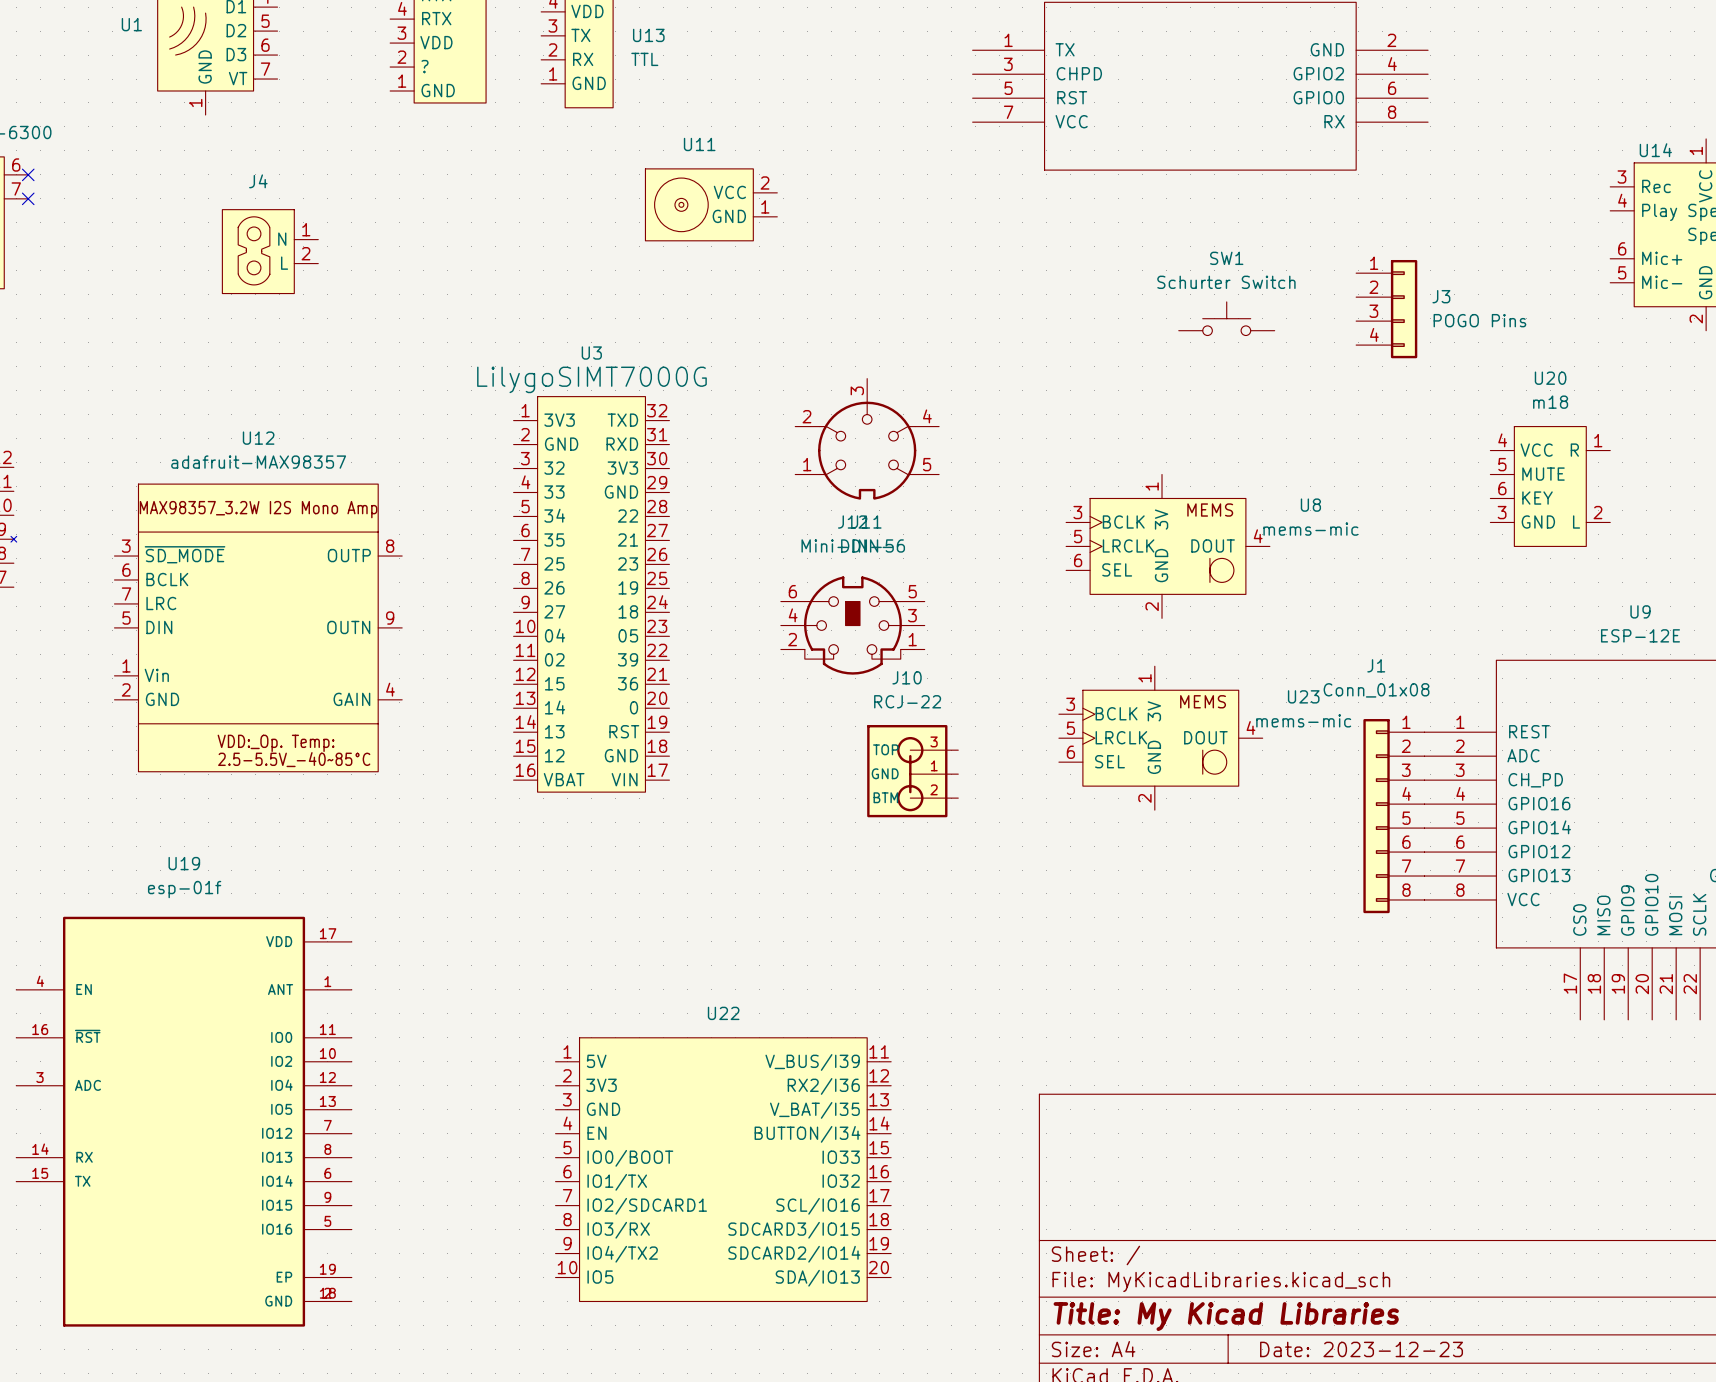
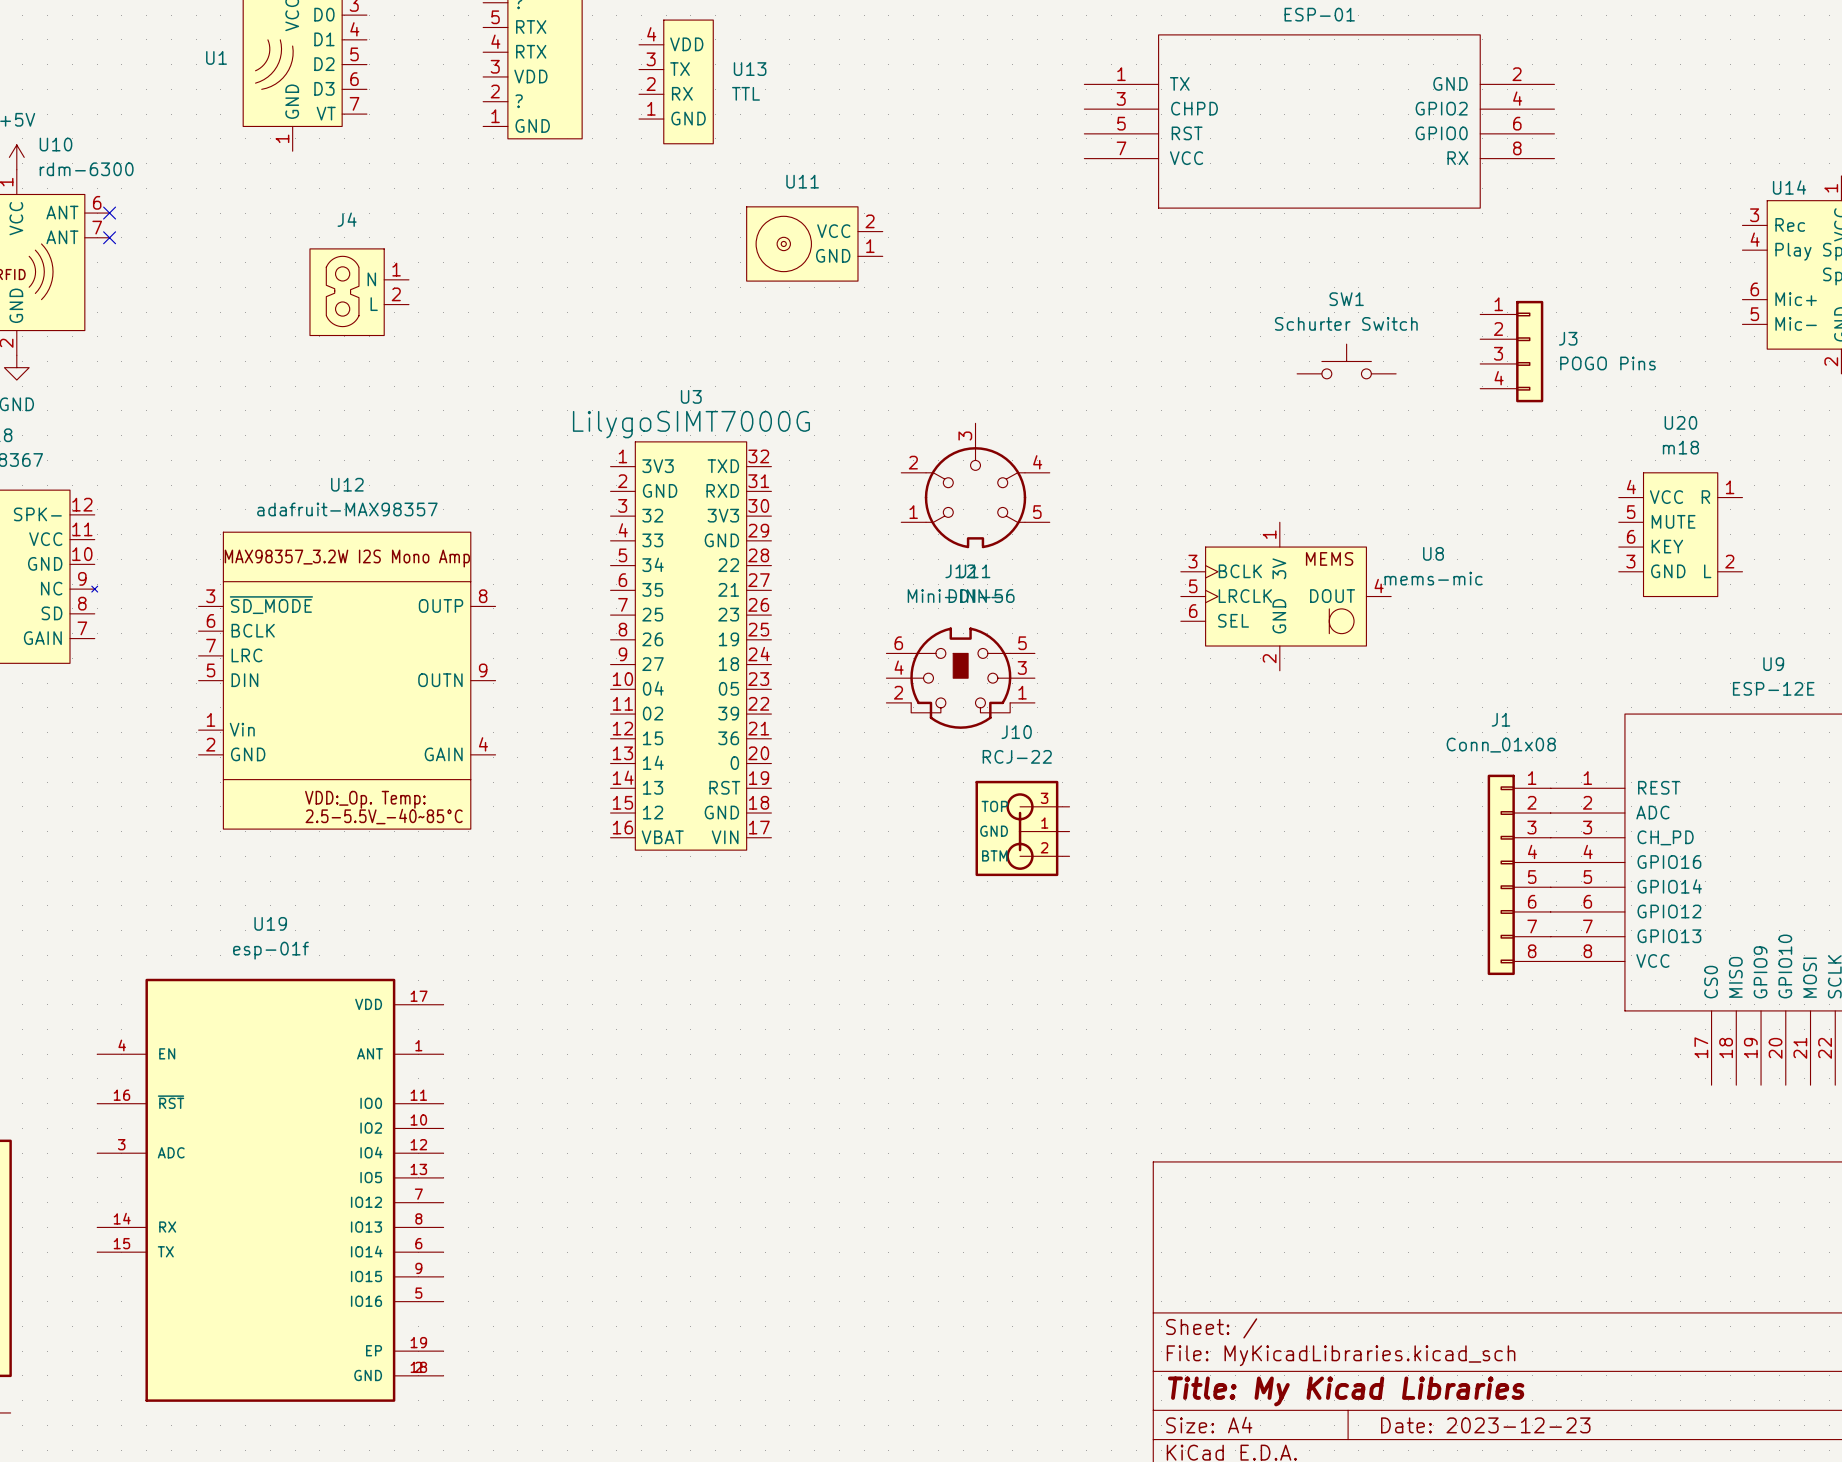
U23: mems-mic (1160, 738) -> none
U22: (723, 1169) -> none

